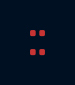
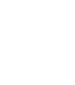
part: (37, 33) -> none
part: (37, 52) -> none

